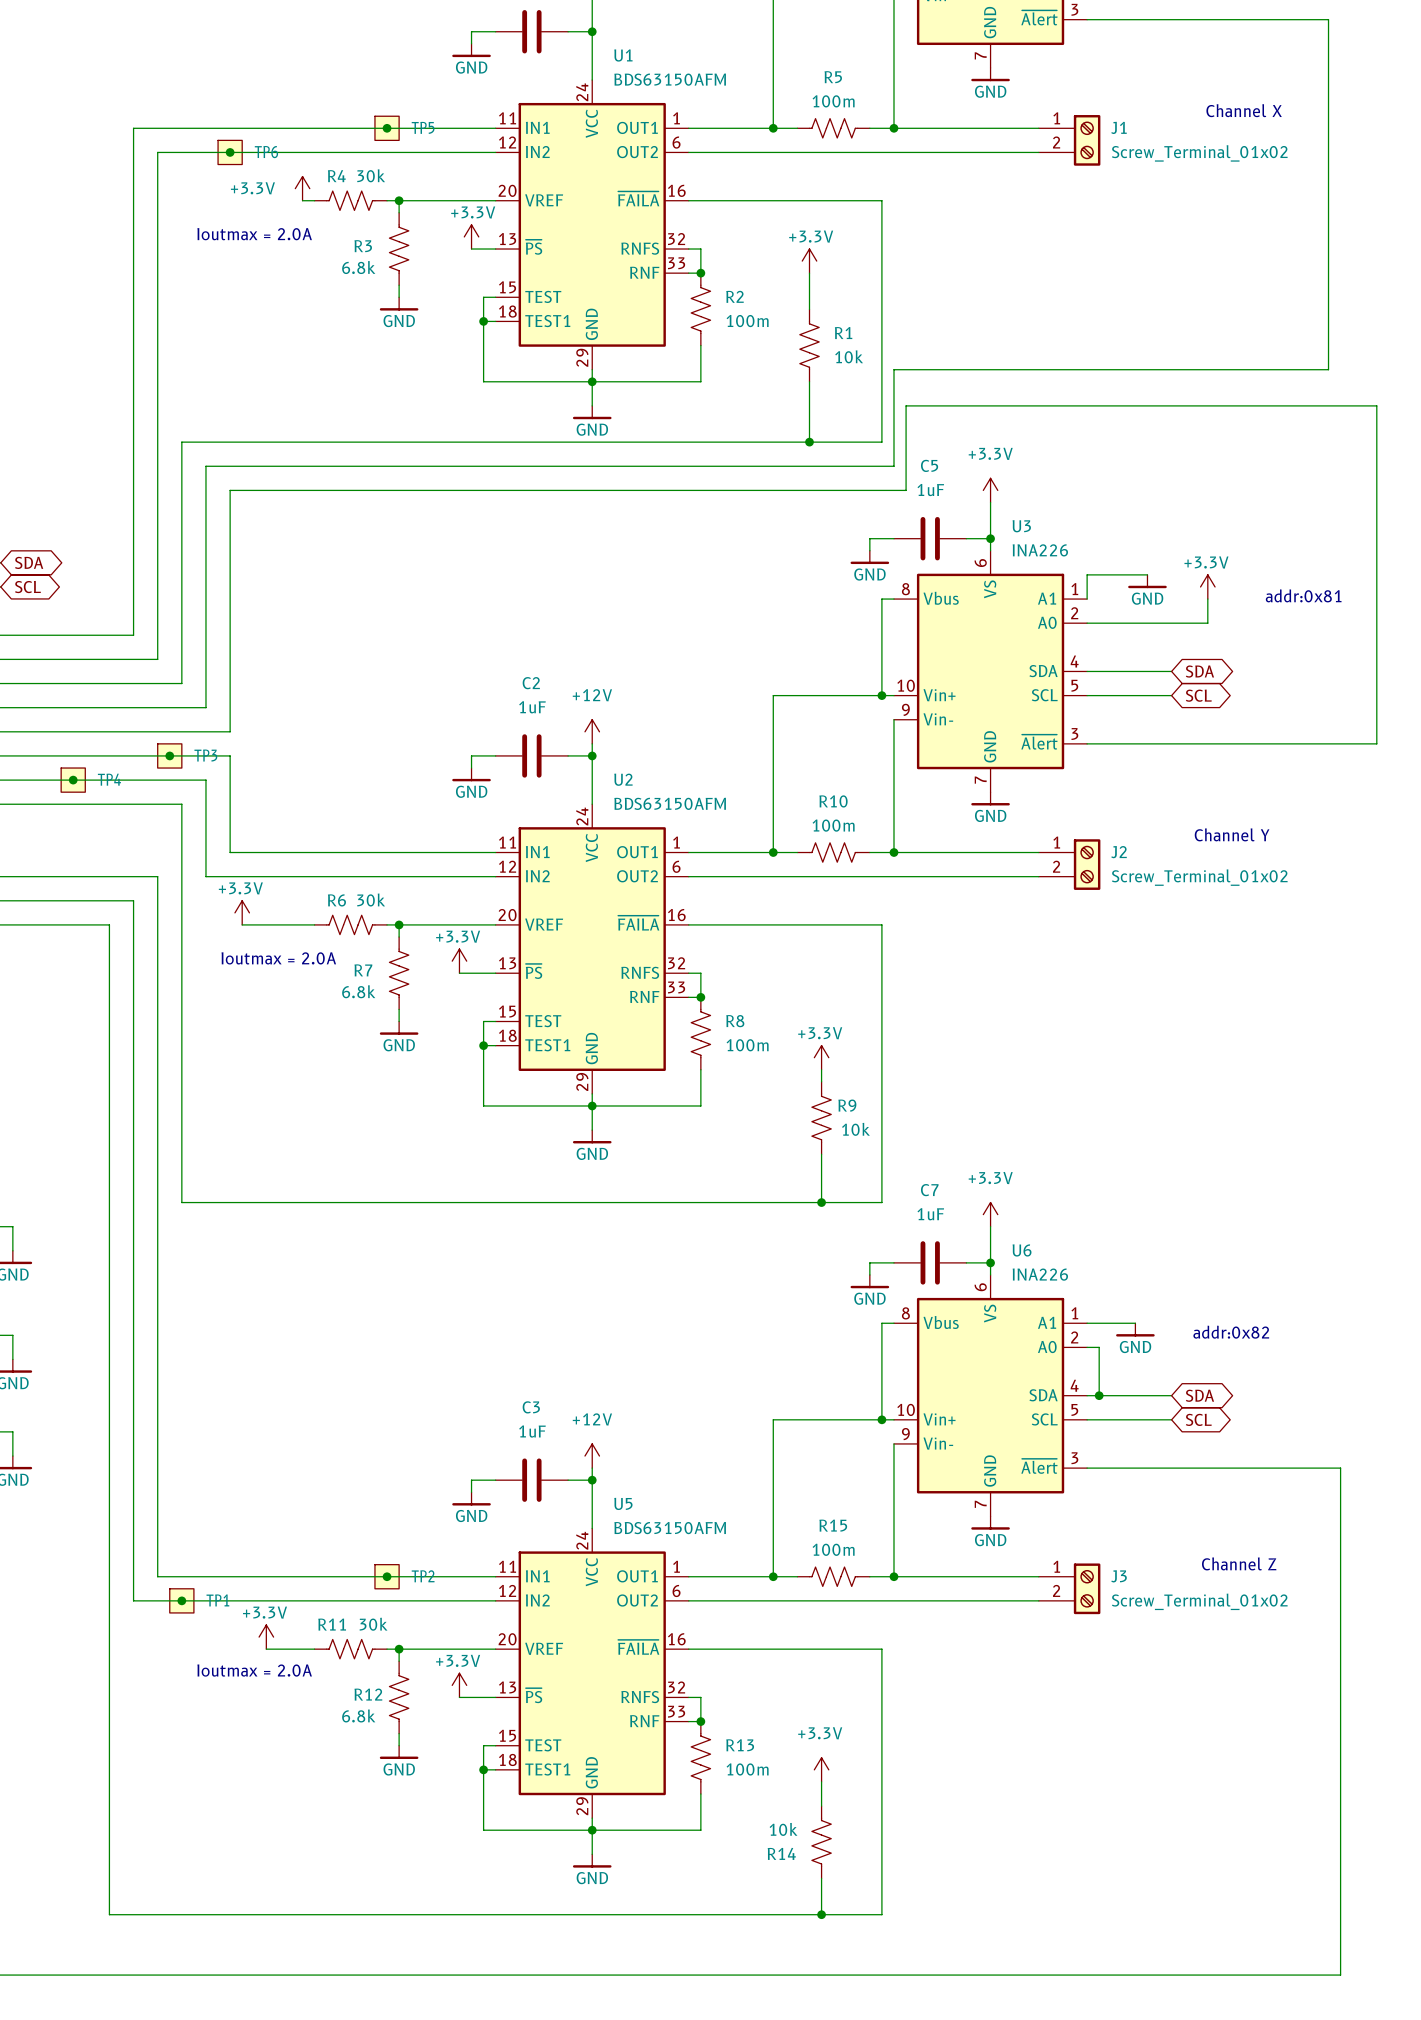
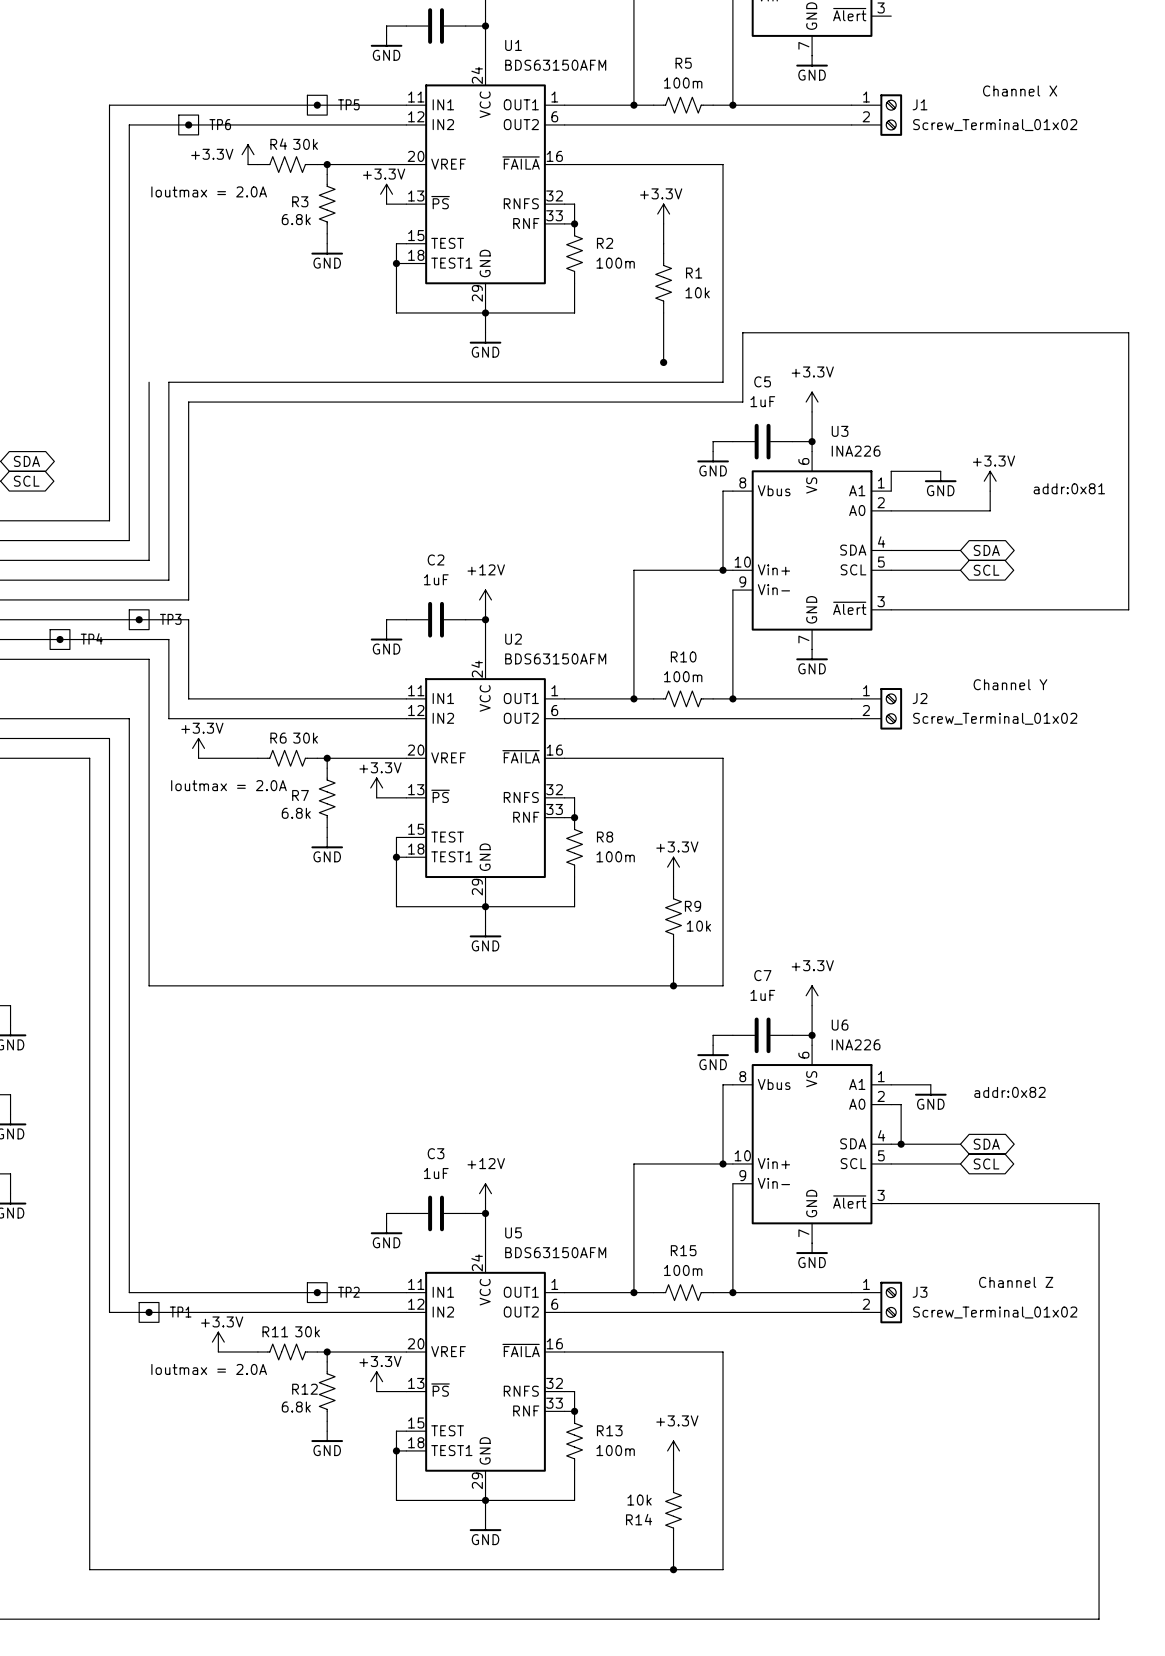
wire: (1087, 19) (1328, 19) (1328, 369) (893, 369) (893, 466) (881, 466) -> (723, 362) (723, 382)
wire: (881, 442) (181, 442) (181, 466) -> none

